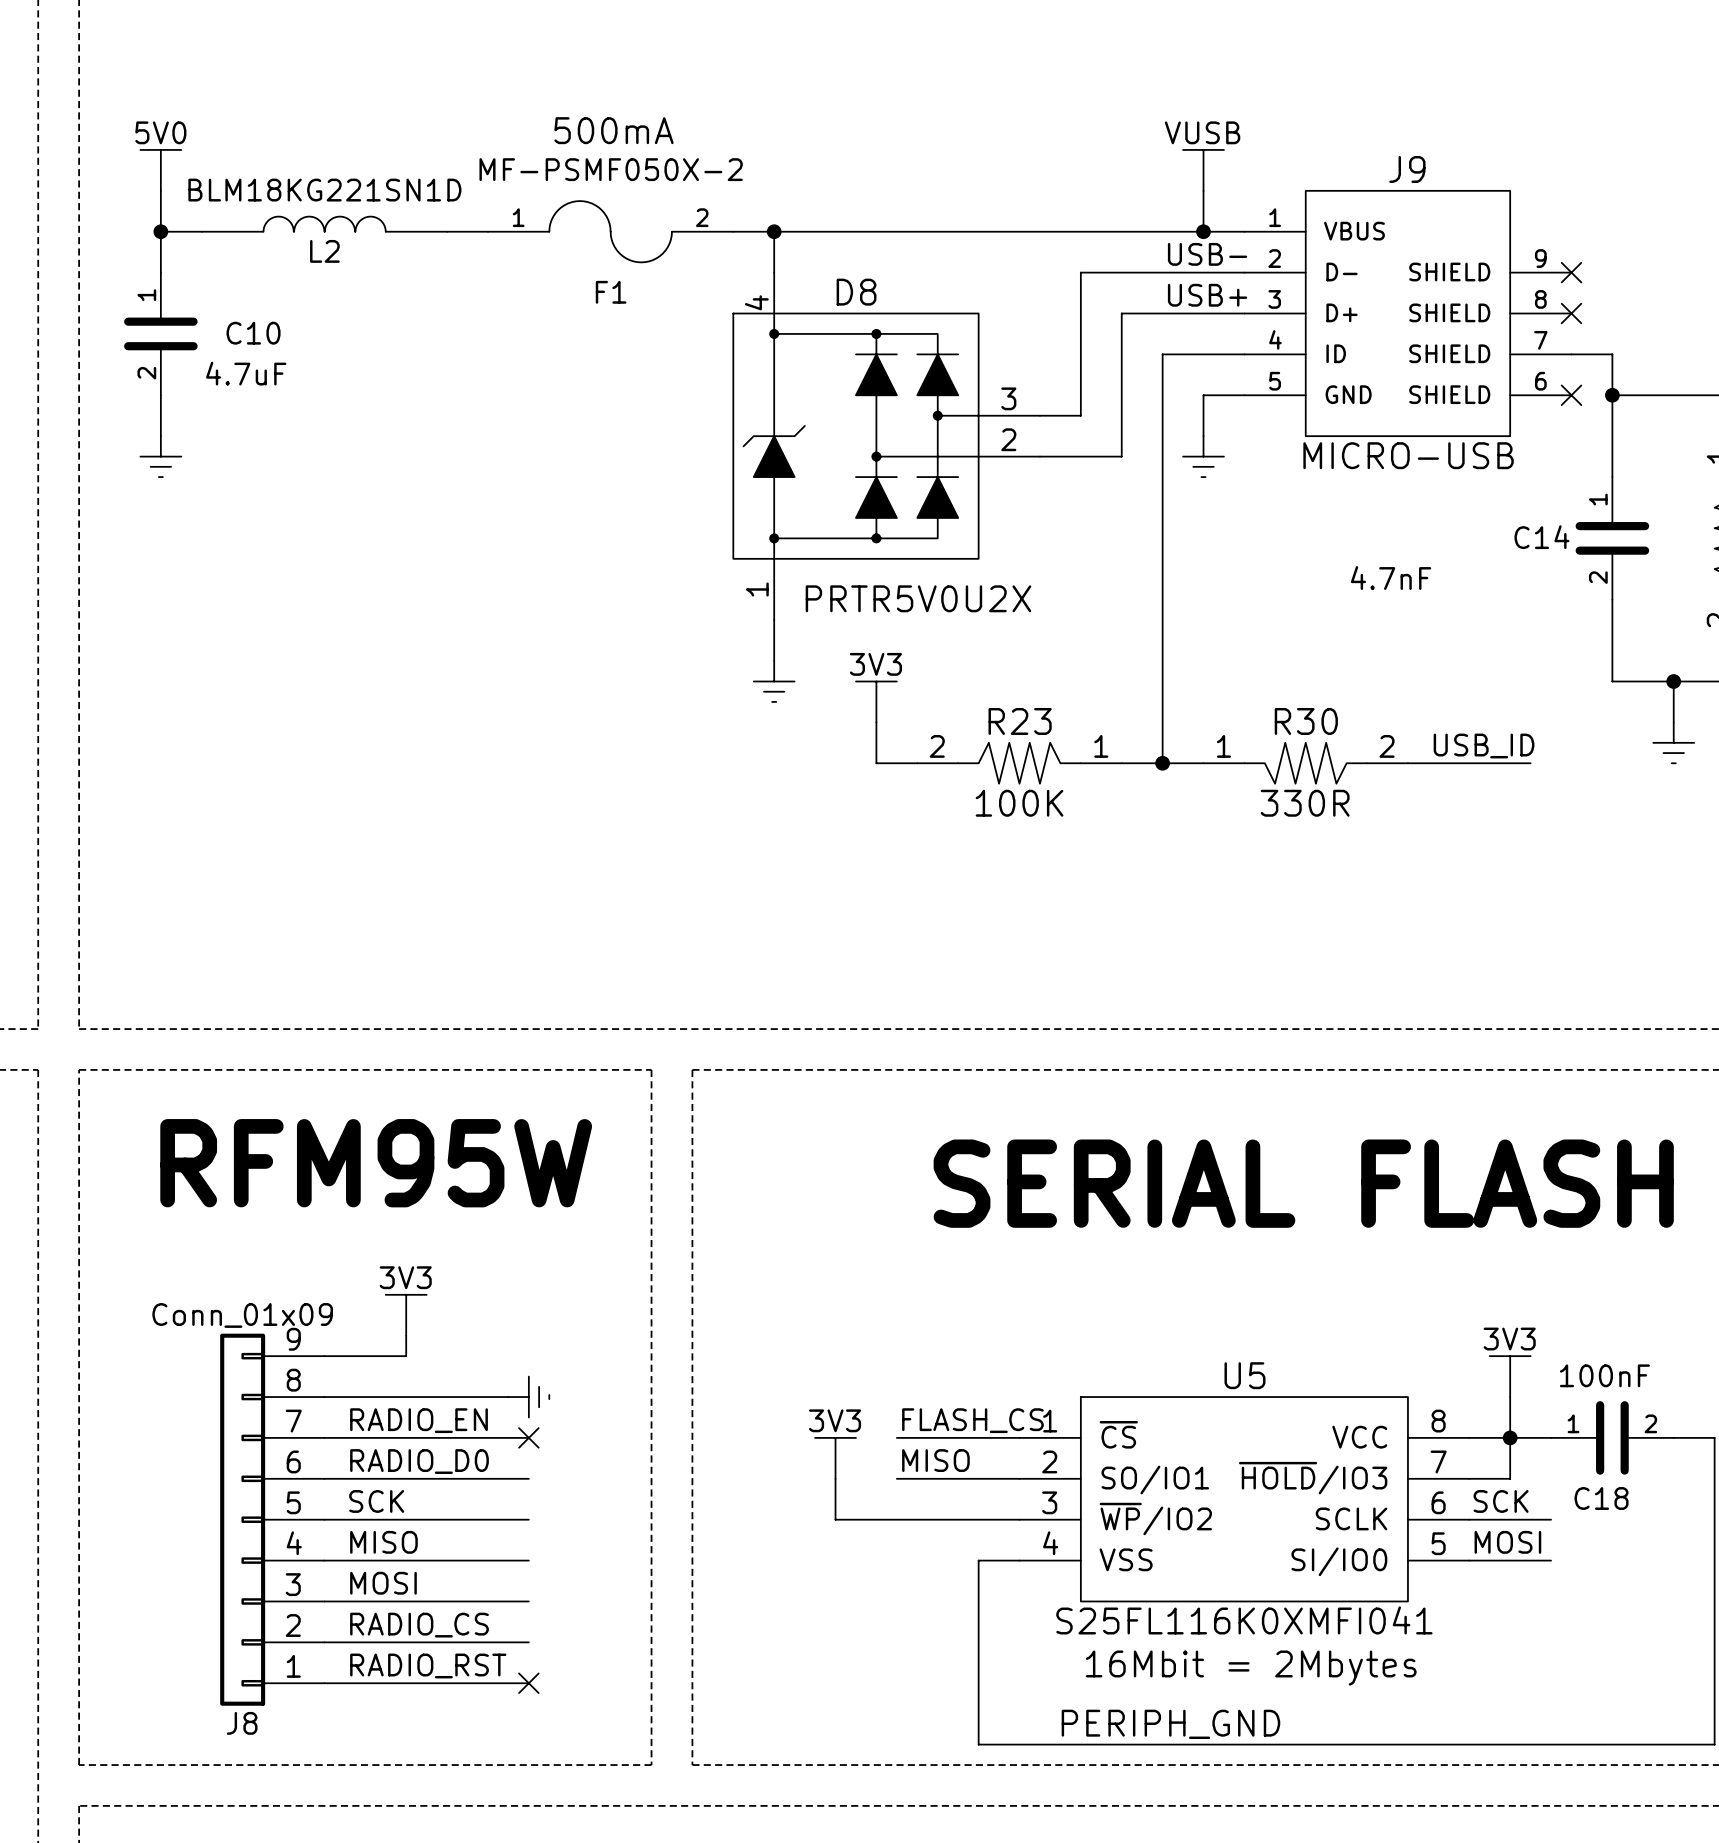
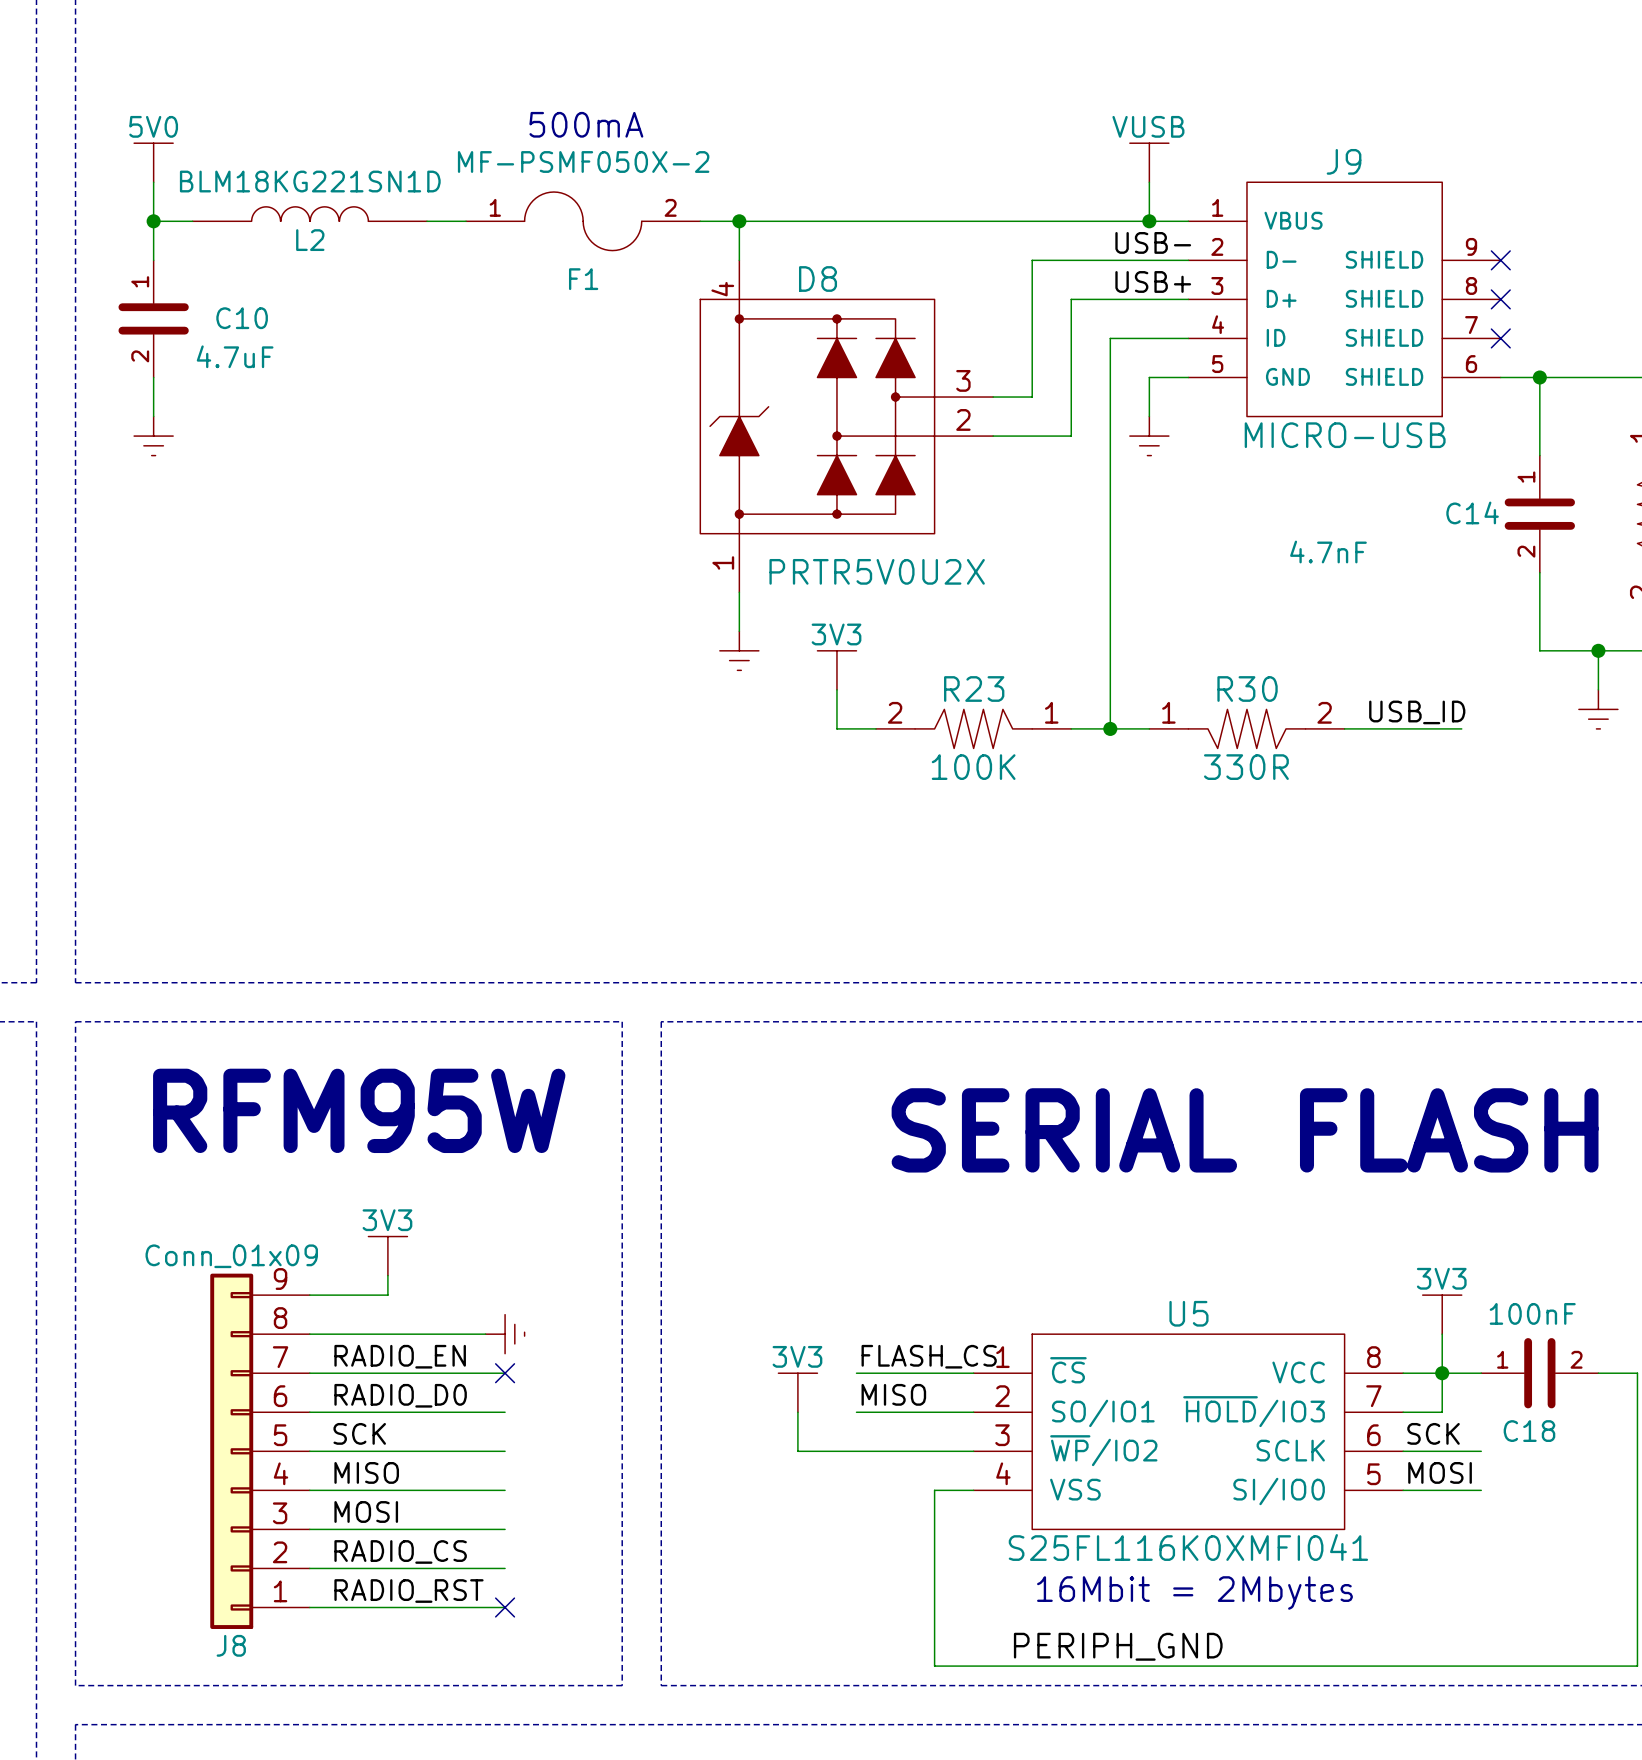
wire: (1571, 354) (1612, 354) (1612, 395) -> (1500, 377) (1539, 377)
no-connect mark position: (1571, 395) -> (1500, 338)

